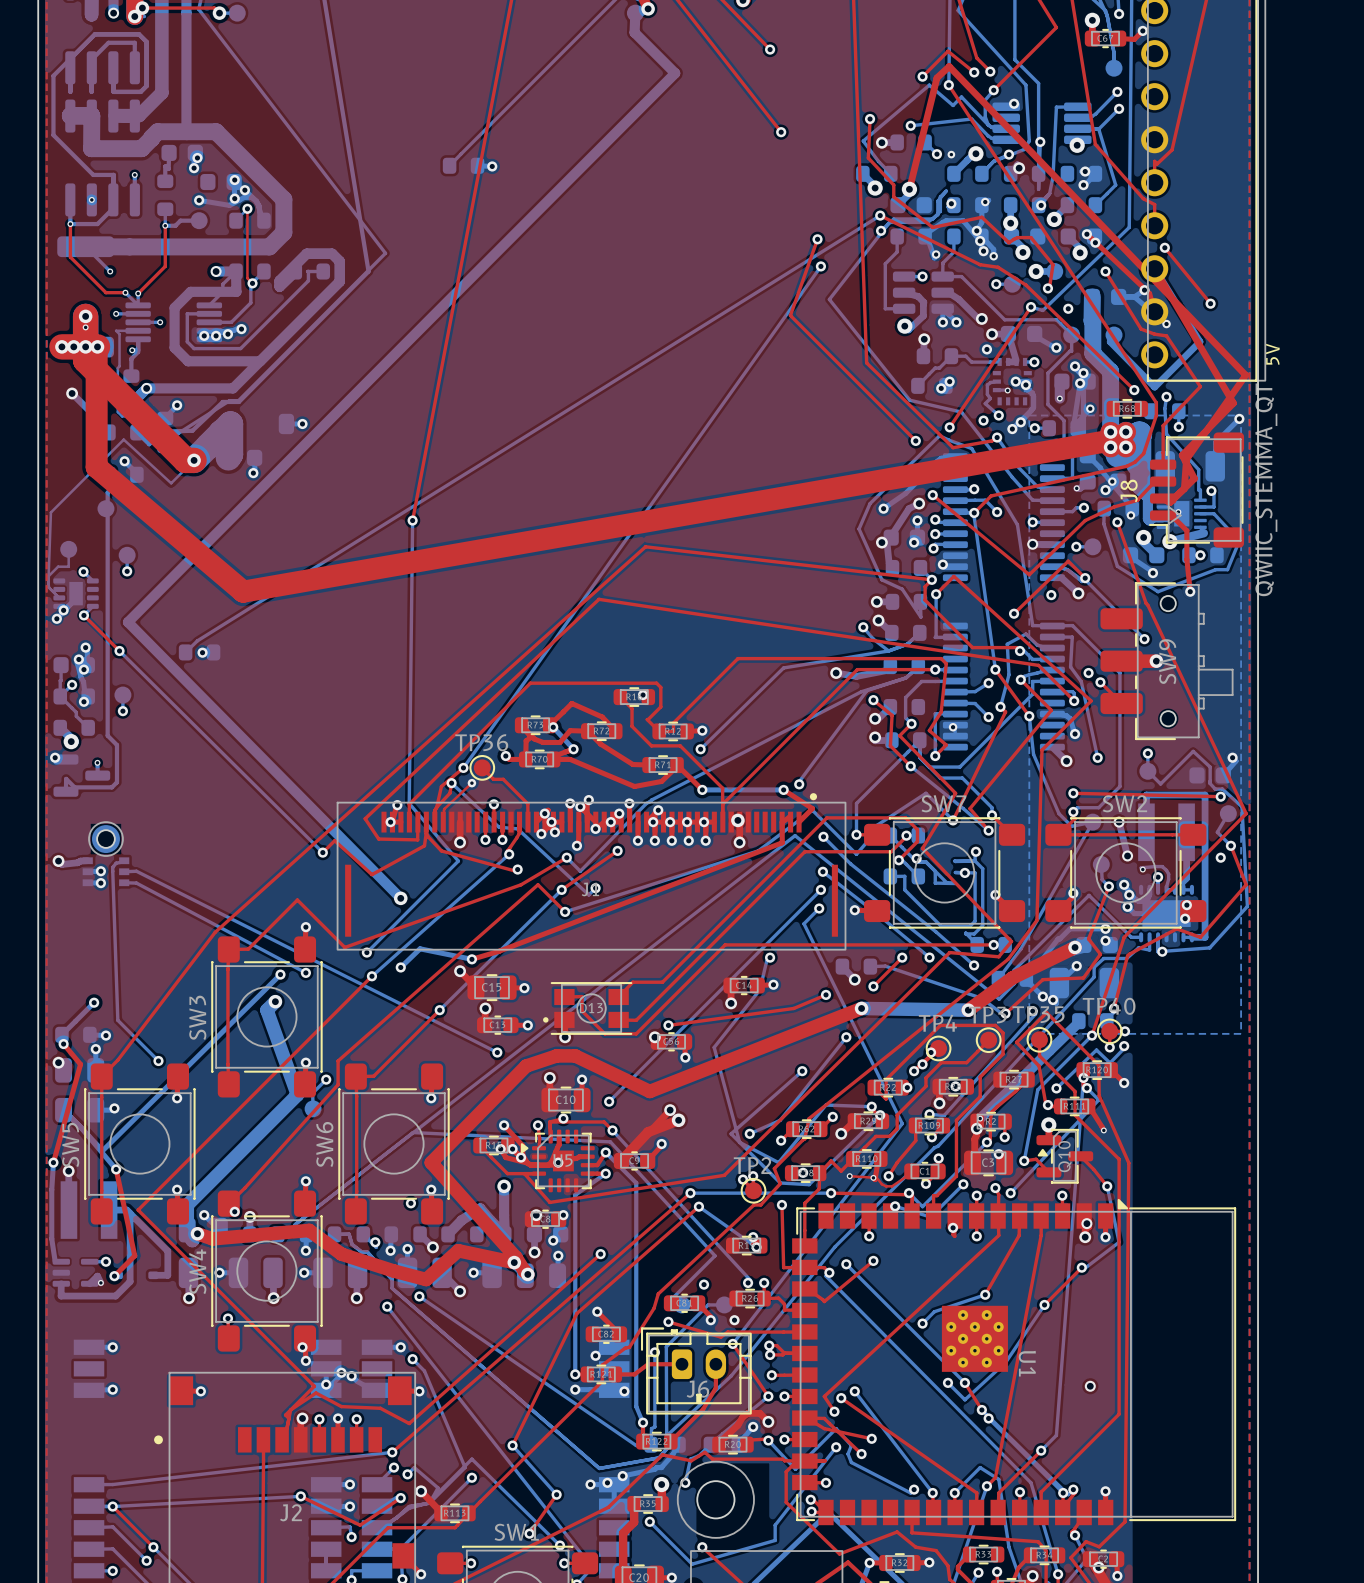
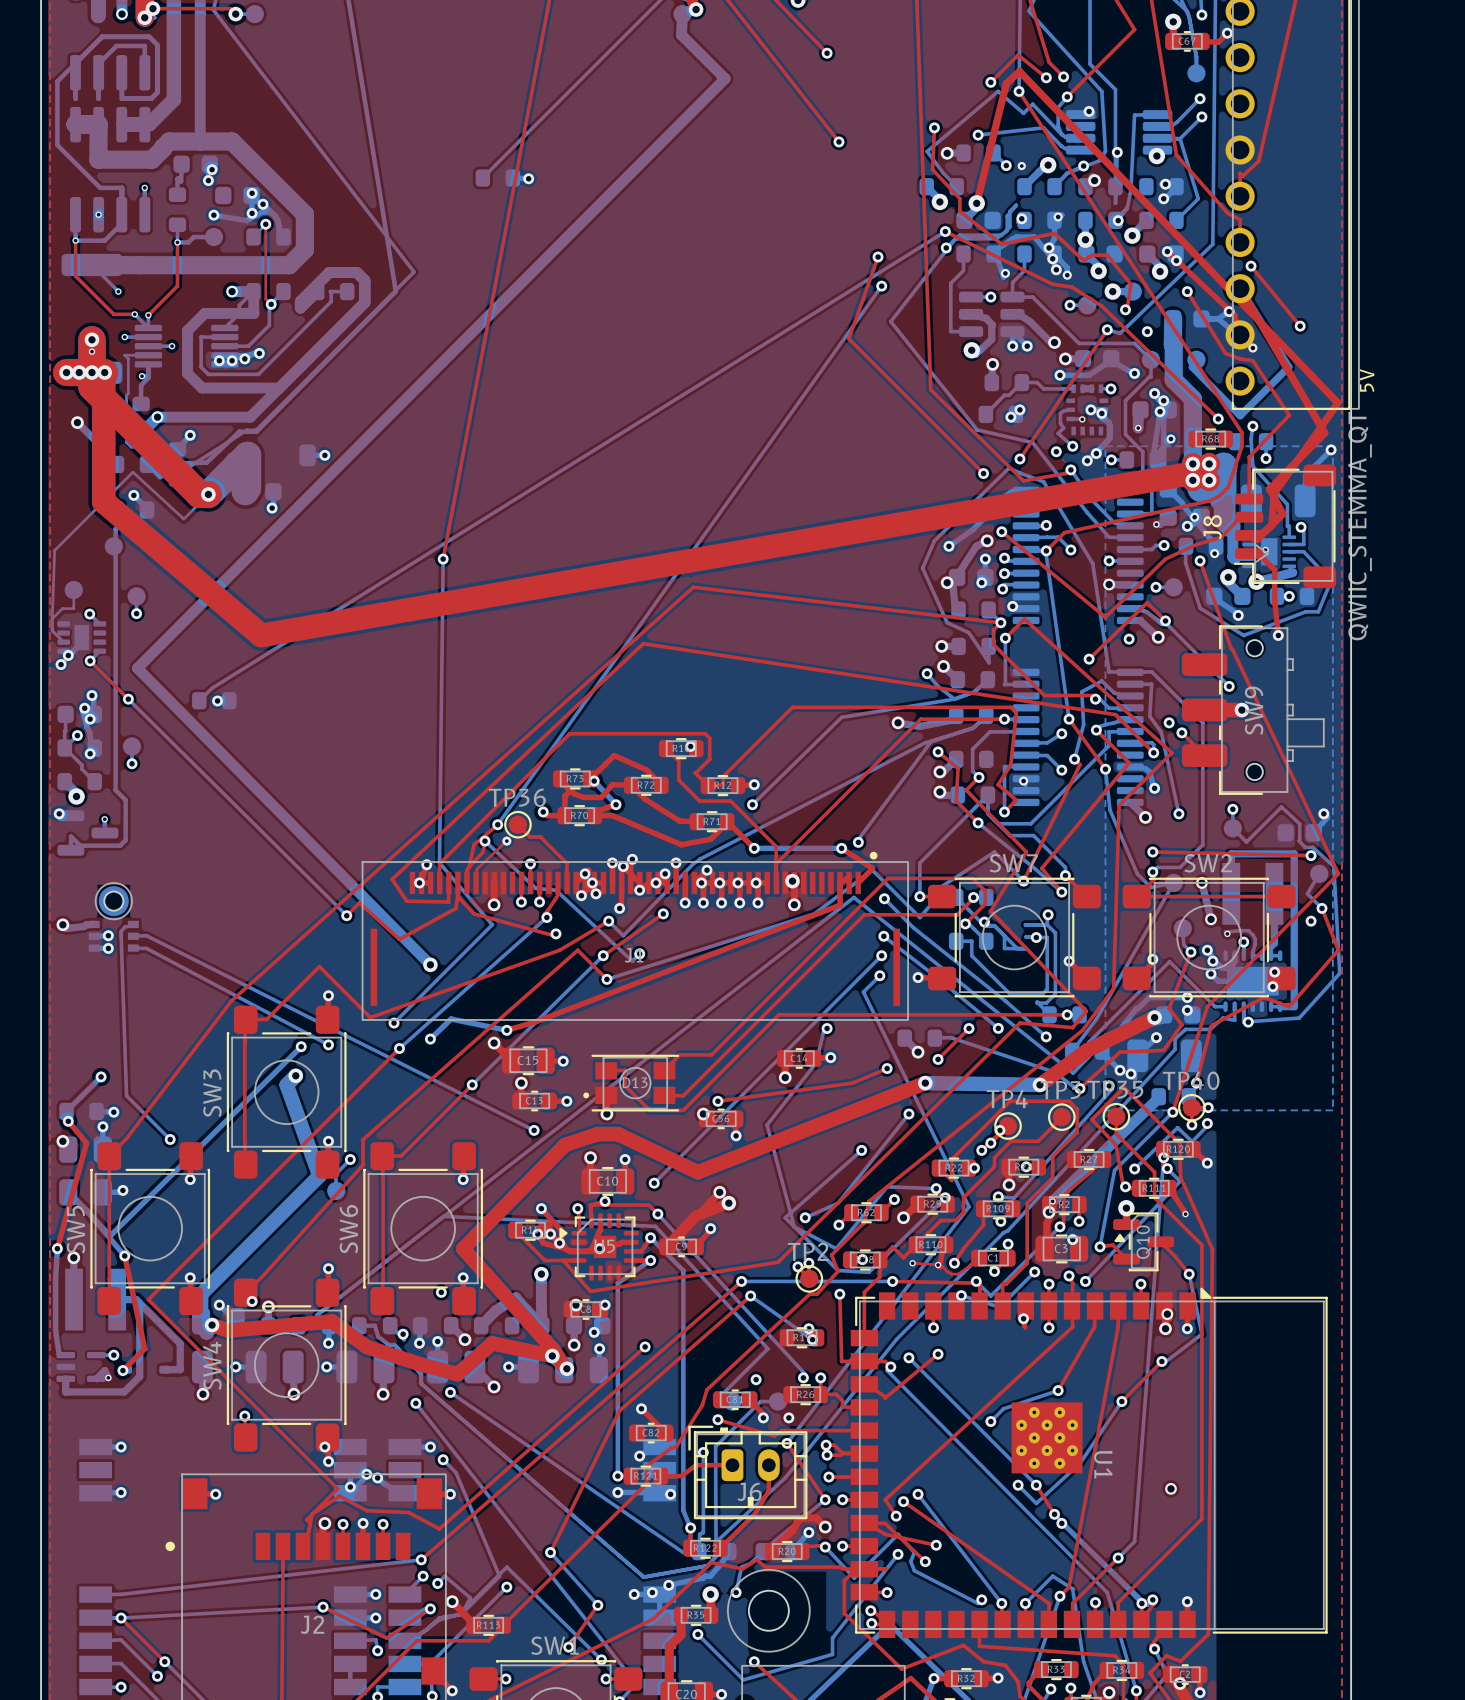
bottom track: (1008, 335) (1016, 360) -> none
bottom track: none -> (1107, 363) (1089, 375) (1059, 375)

